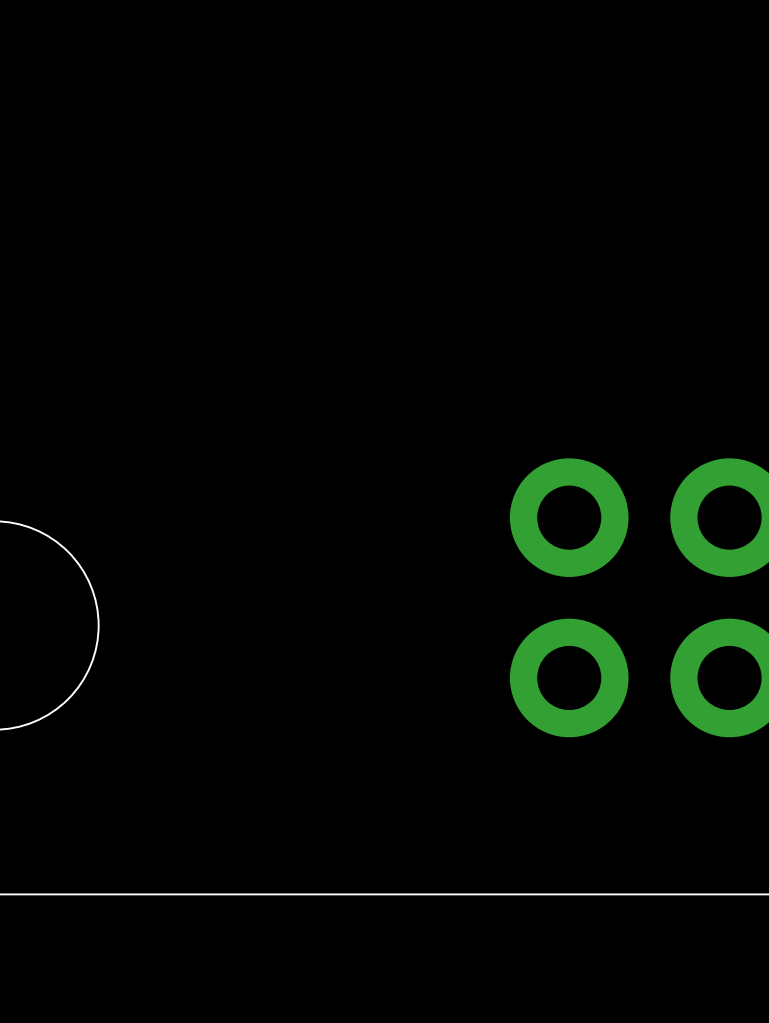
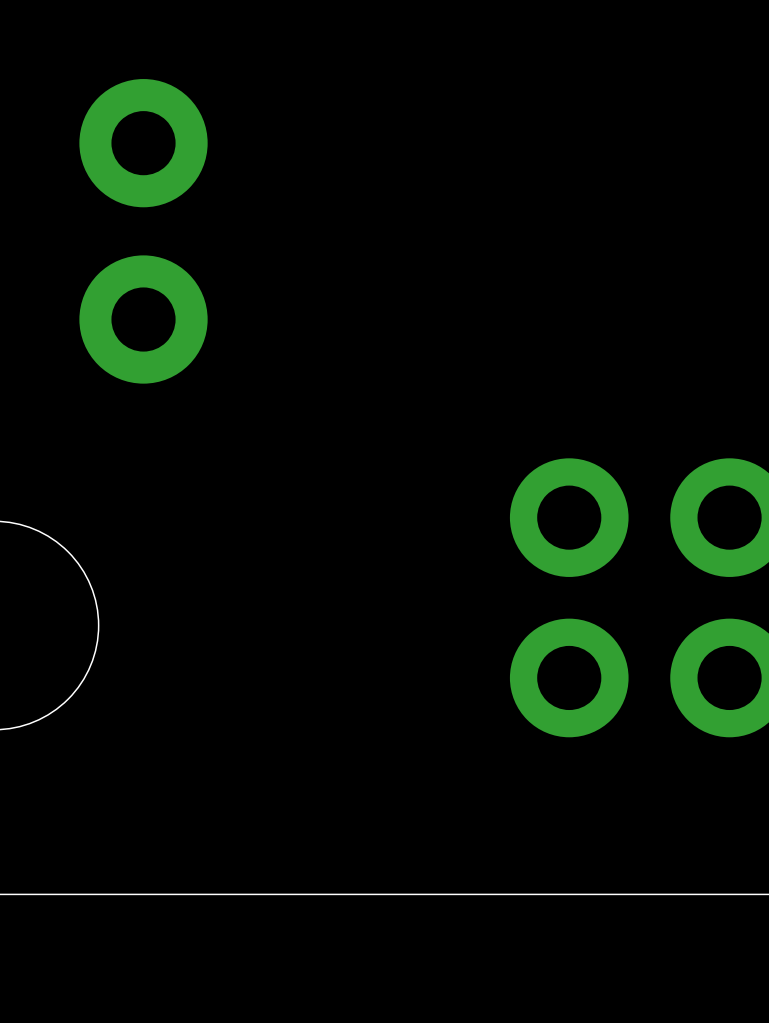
part: none -> (143, 231)

